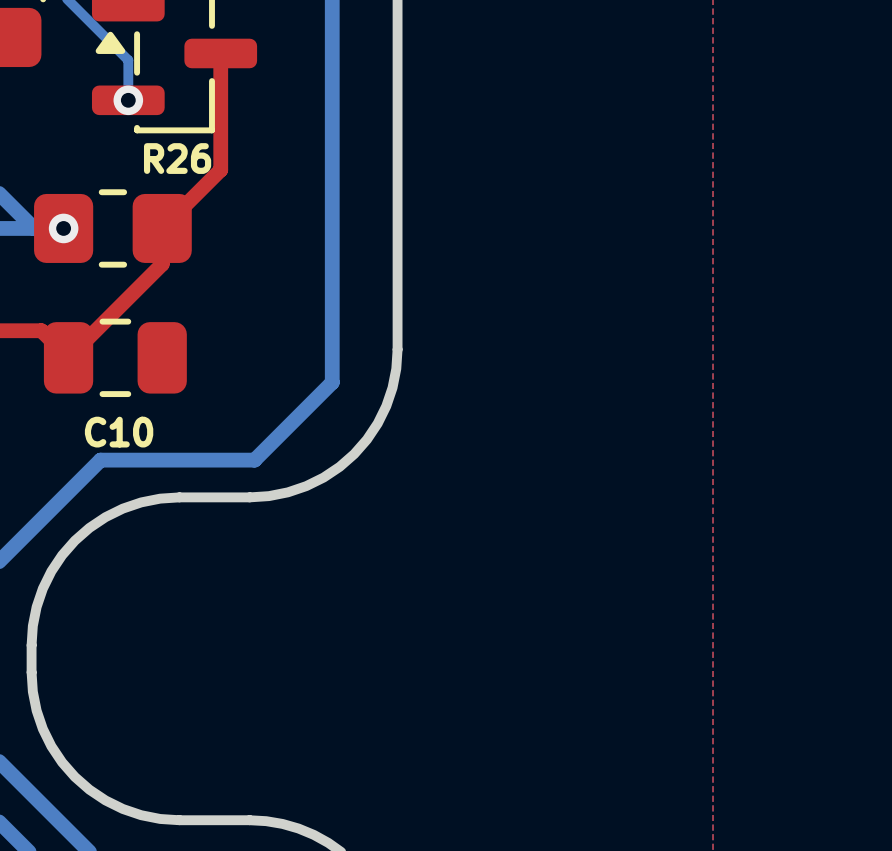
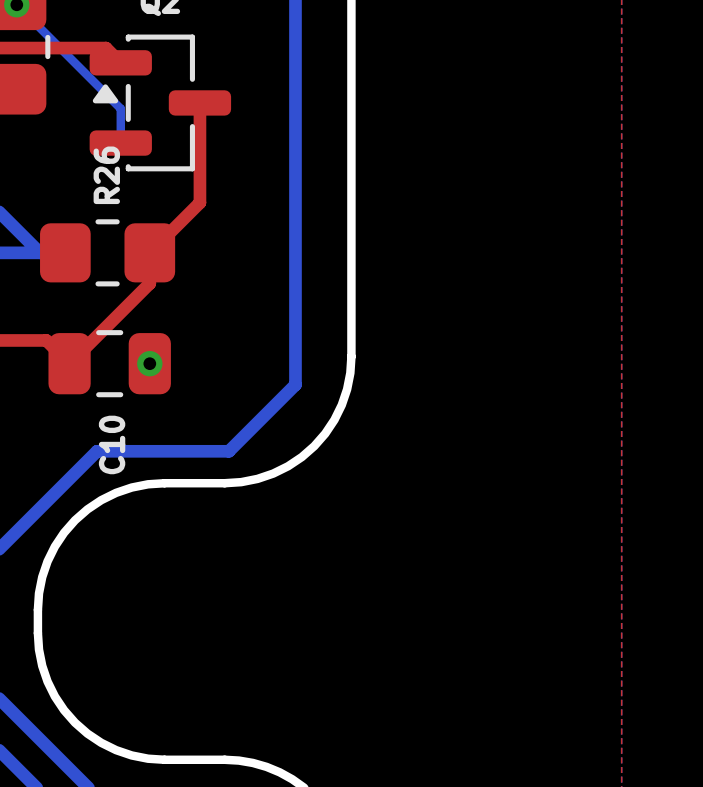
via: (128, 100) -> none
R26 name rotation: 0° (177, 158) -> 90° counterclockwise (106, 175)
via: (63, 228) -> none
via: none -> (149, 363)
C10 name rotation: 0° (119, 432) -> 90° counterclockwise (112, 444)

